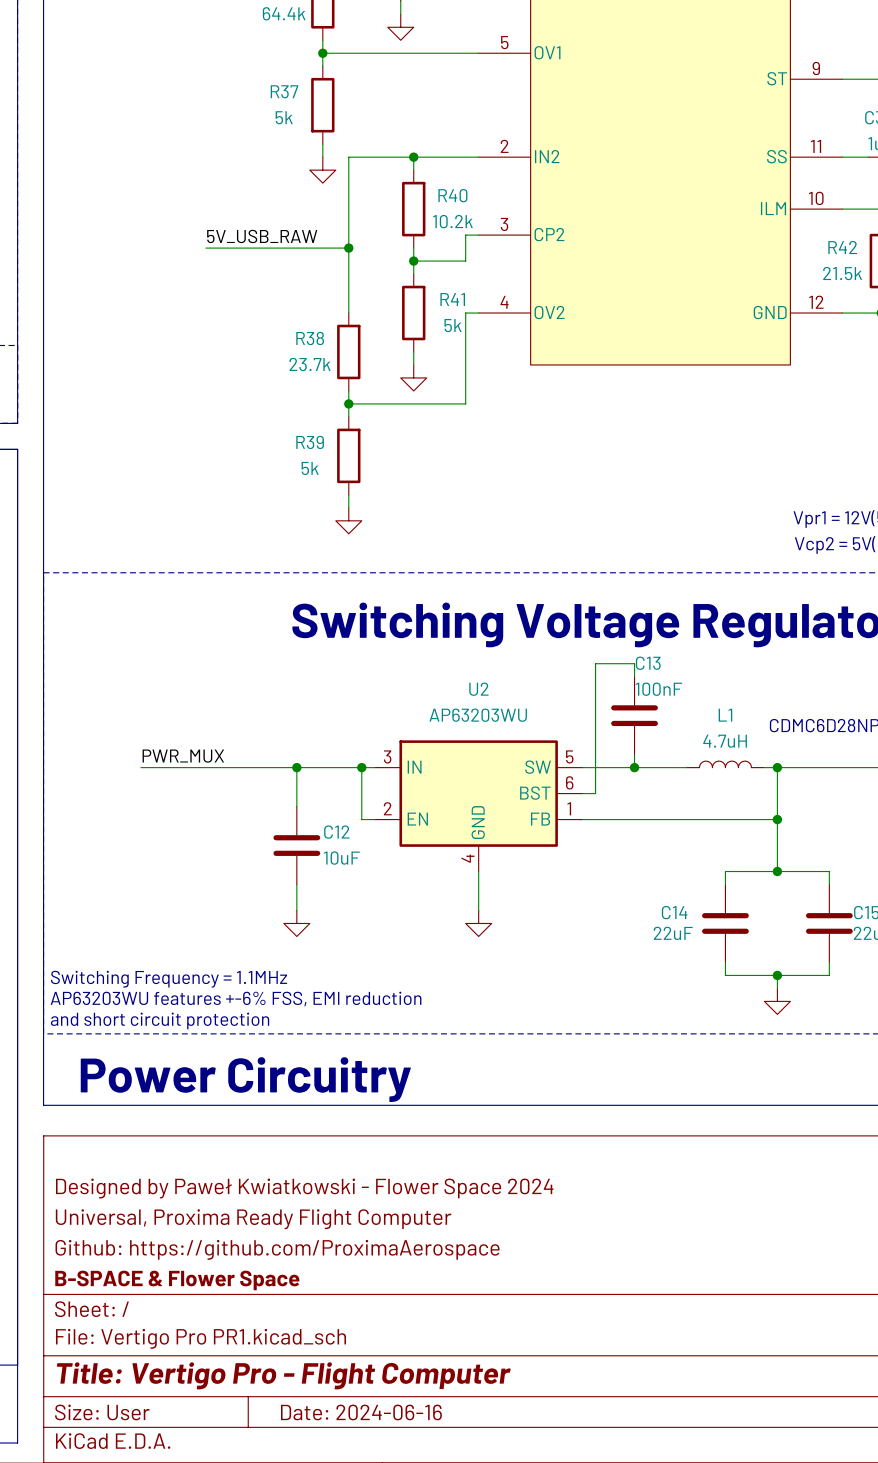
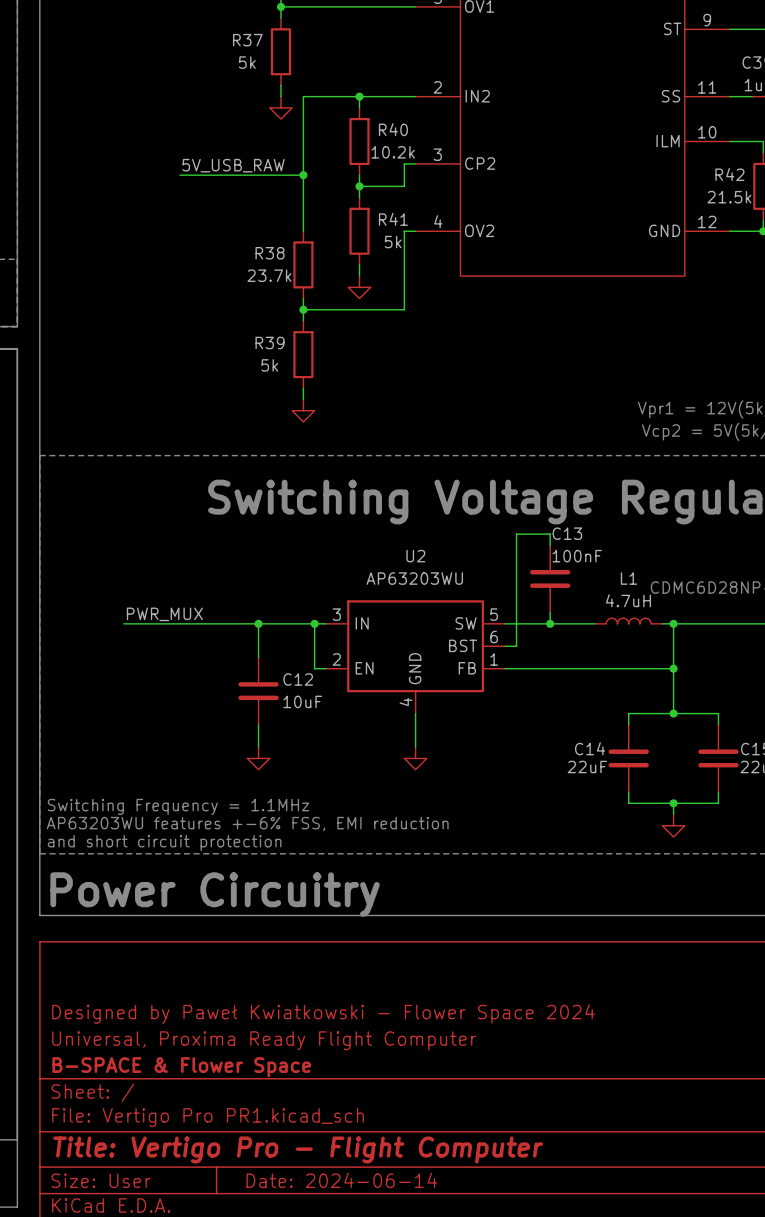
title block: Designed by Paweł Kwiatkowski - Flower Space 2024 (304, 1188) -> none
title block: Universal, Proxima Ready Flight Computer (253, 1219) -> Designed by Paweł Kwiatkowski - Flower Space 2024 (323, 1013)
title block: Github: https://github.com/ProximaAerospace (277, 1249) -> Universal, Proxima Ready Flight Computer (264, 1040)
title block: Date: 2024-06-16 (361, 1412) -> Date: 2024-06-14 (341, 1180)

